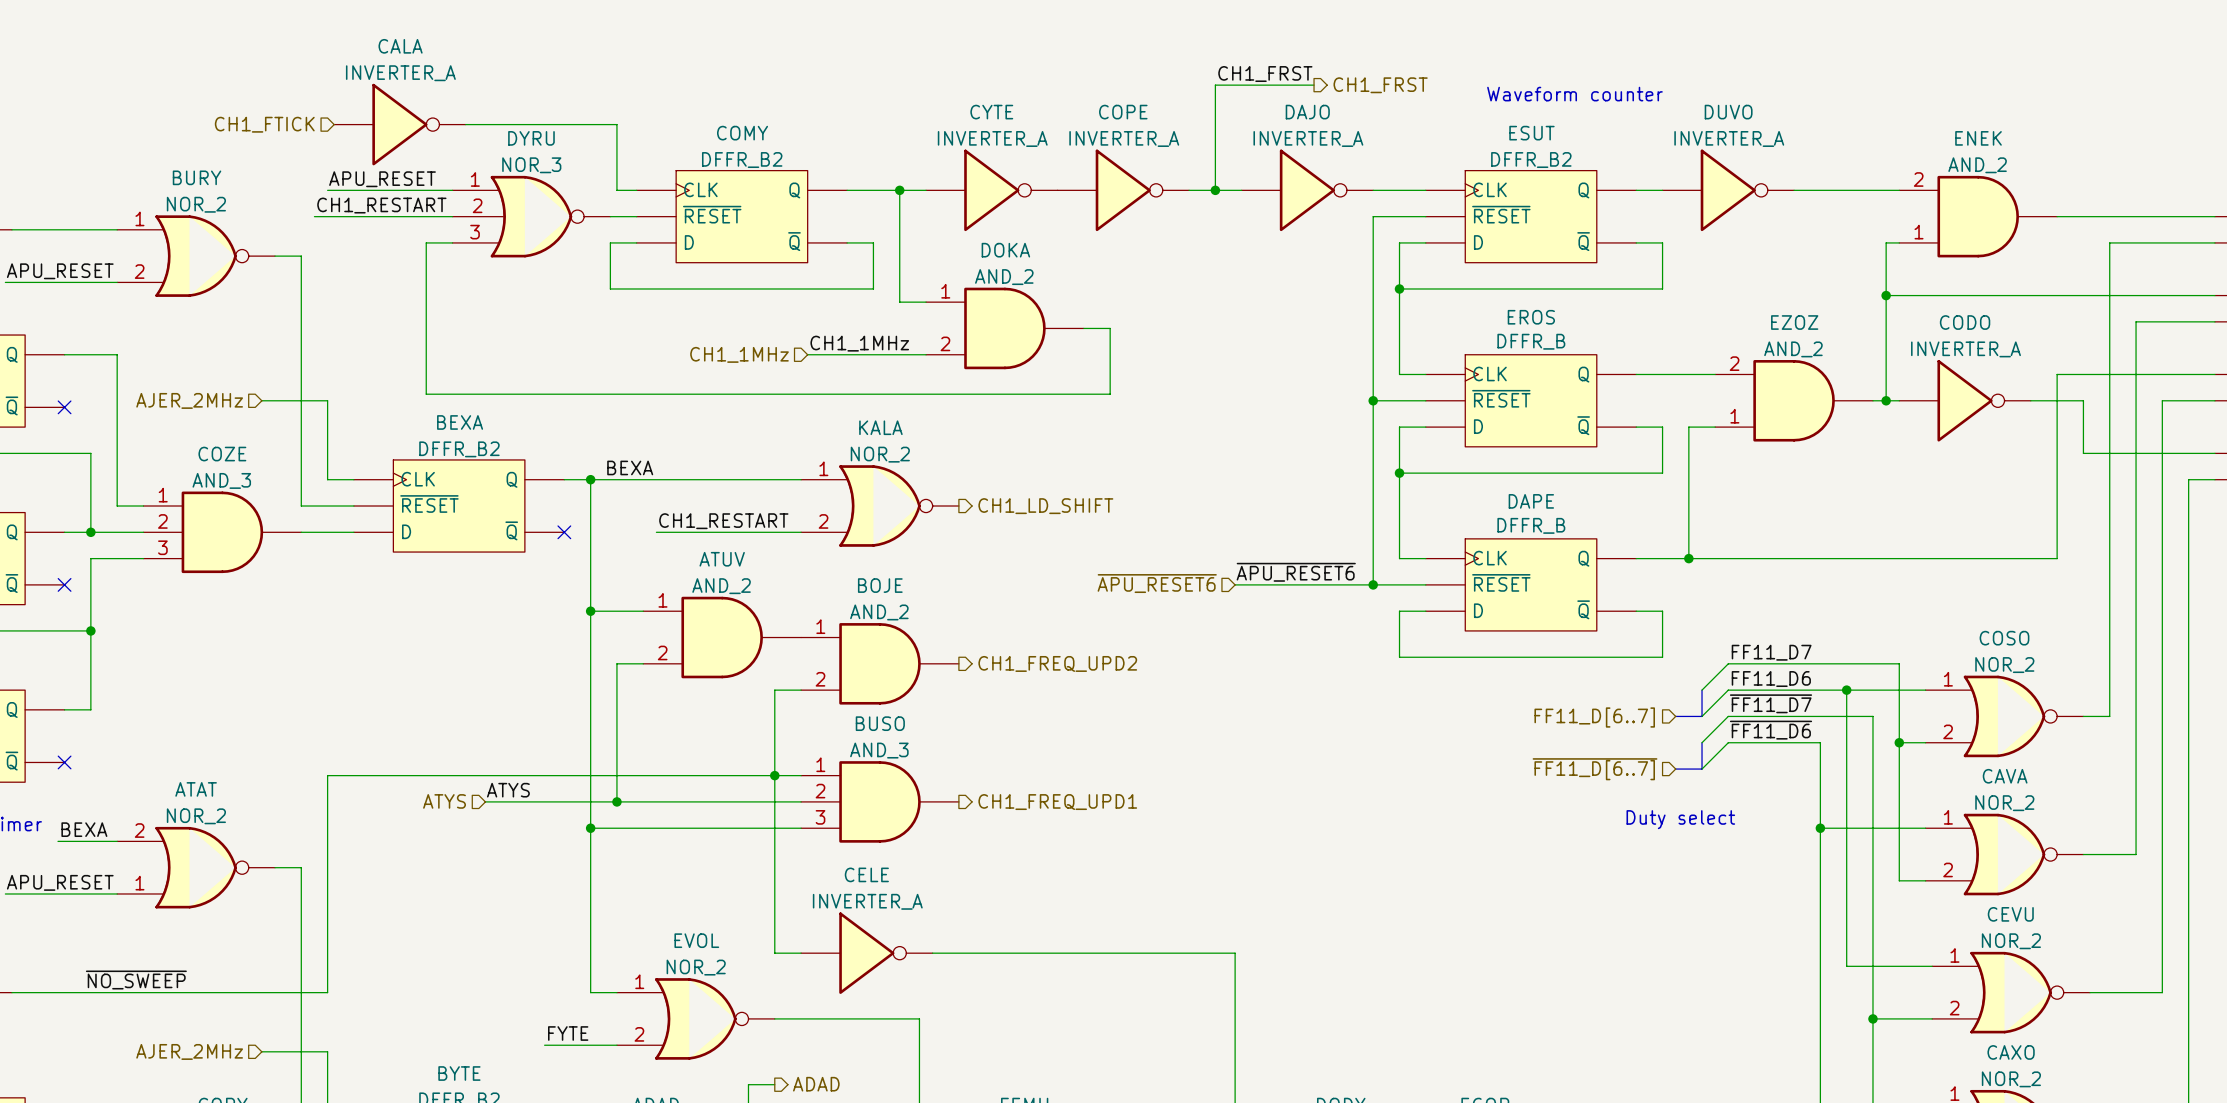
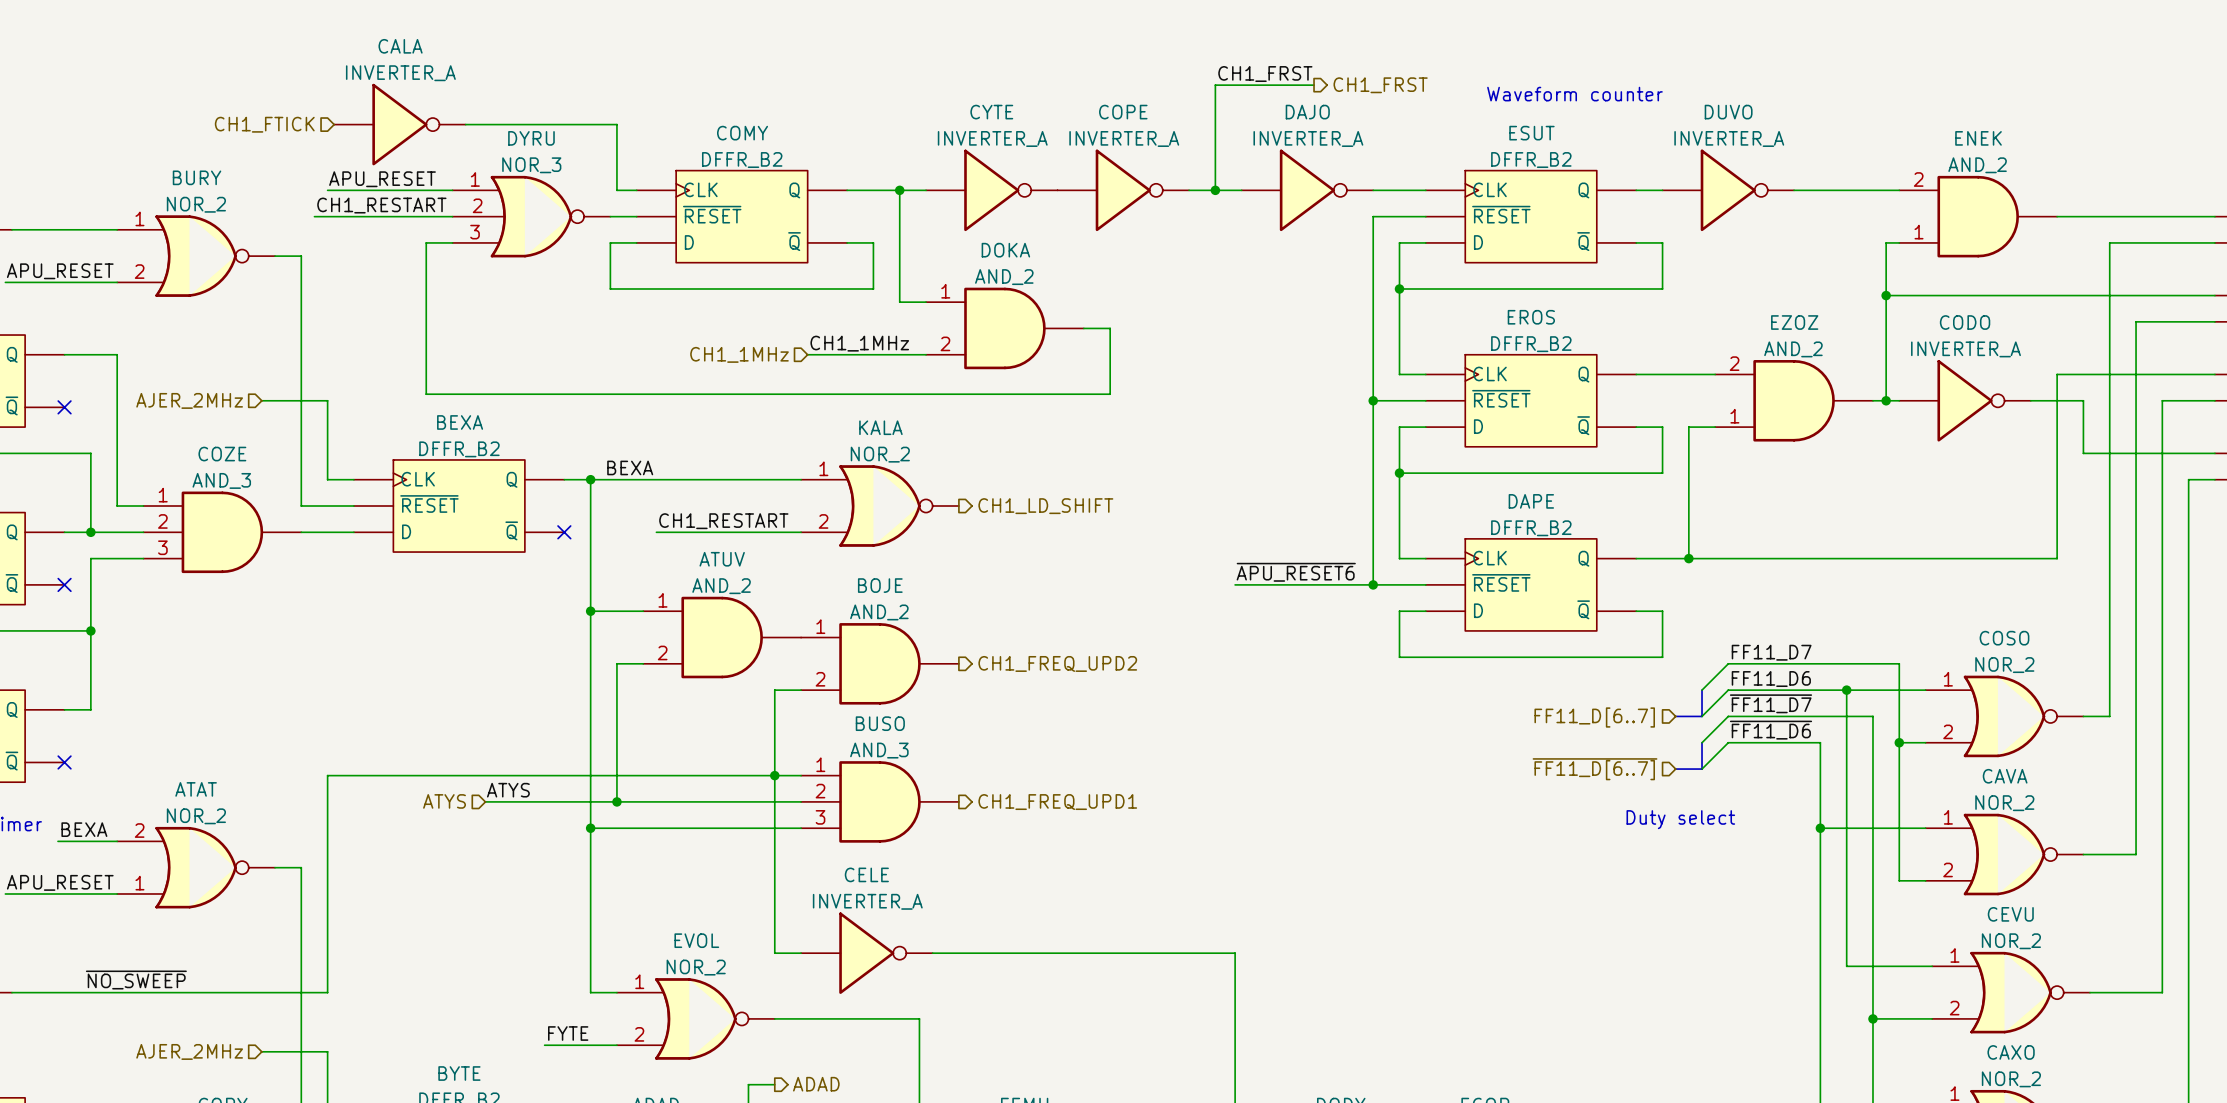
EROS value: DFFR_B (1531, 341) -> DFFR_B2 (1531, 344)
DAPE value: DFFR_B (1531, 525) -> DFFR_B2 (1531, 528)
hierarchical label: ~{APU_RESET6} (1157, 583) -> none

